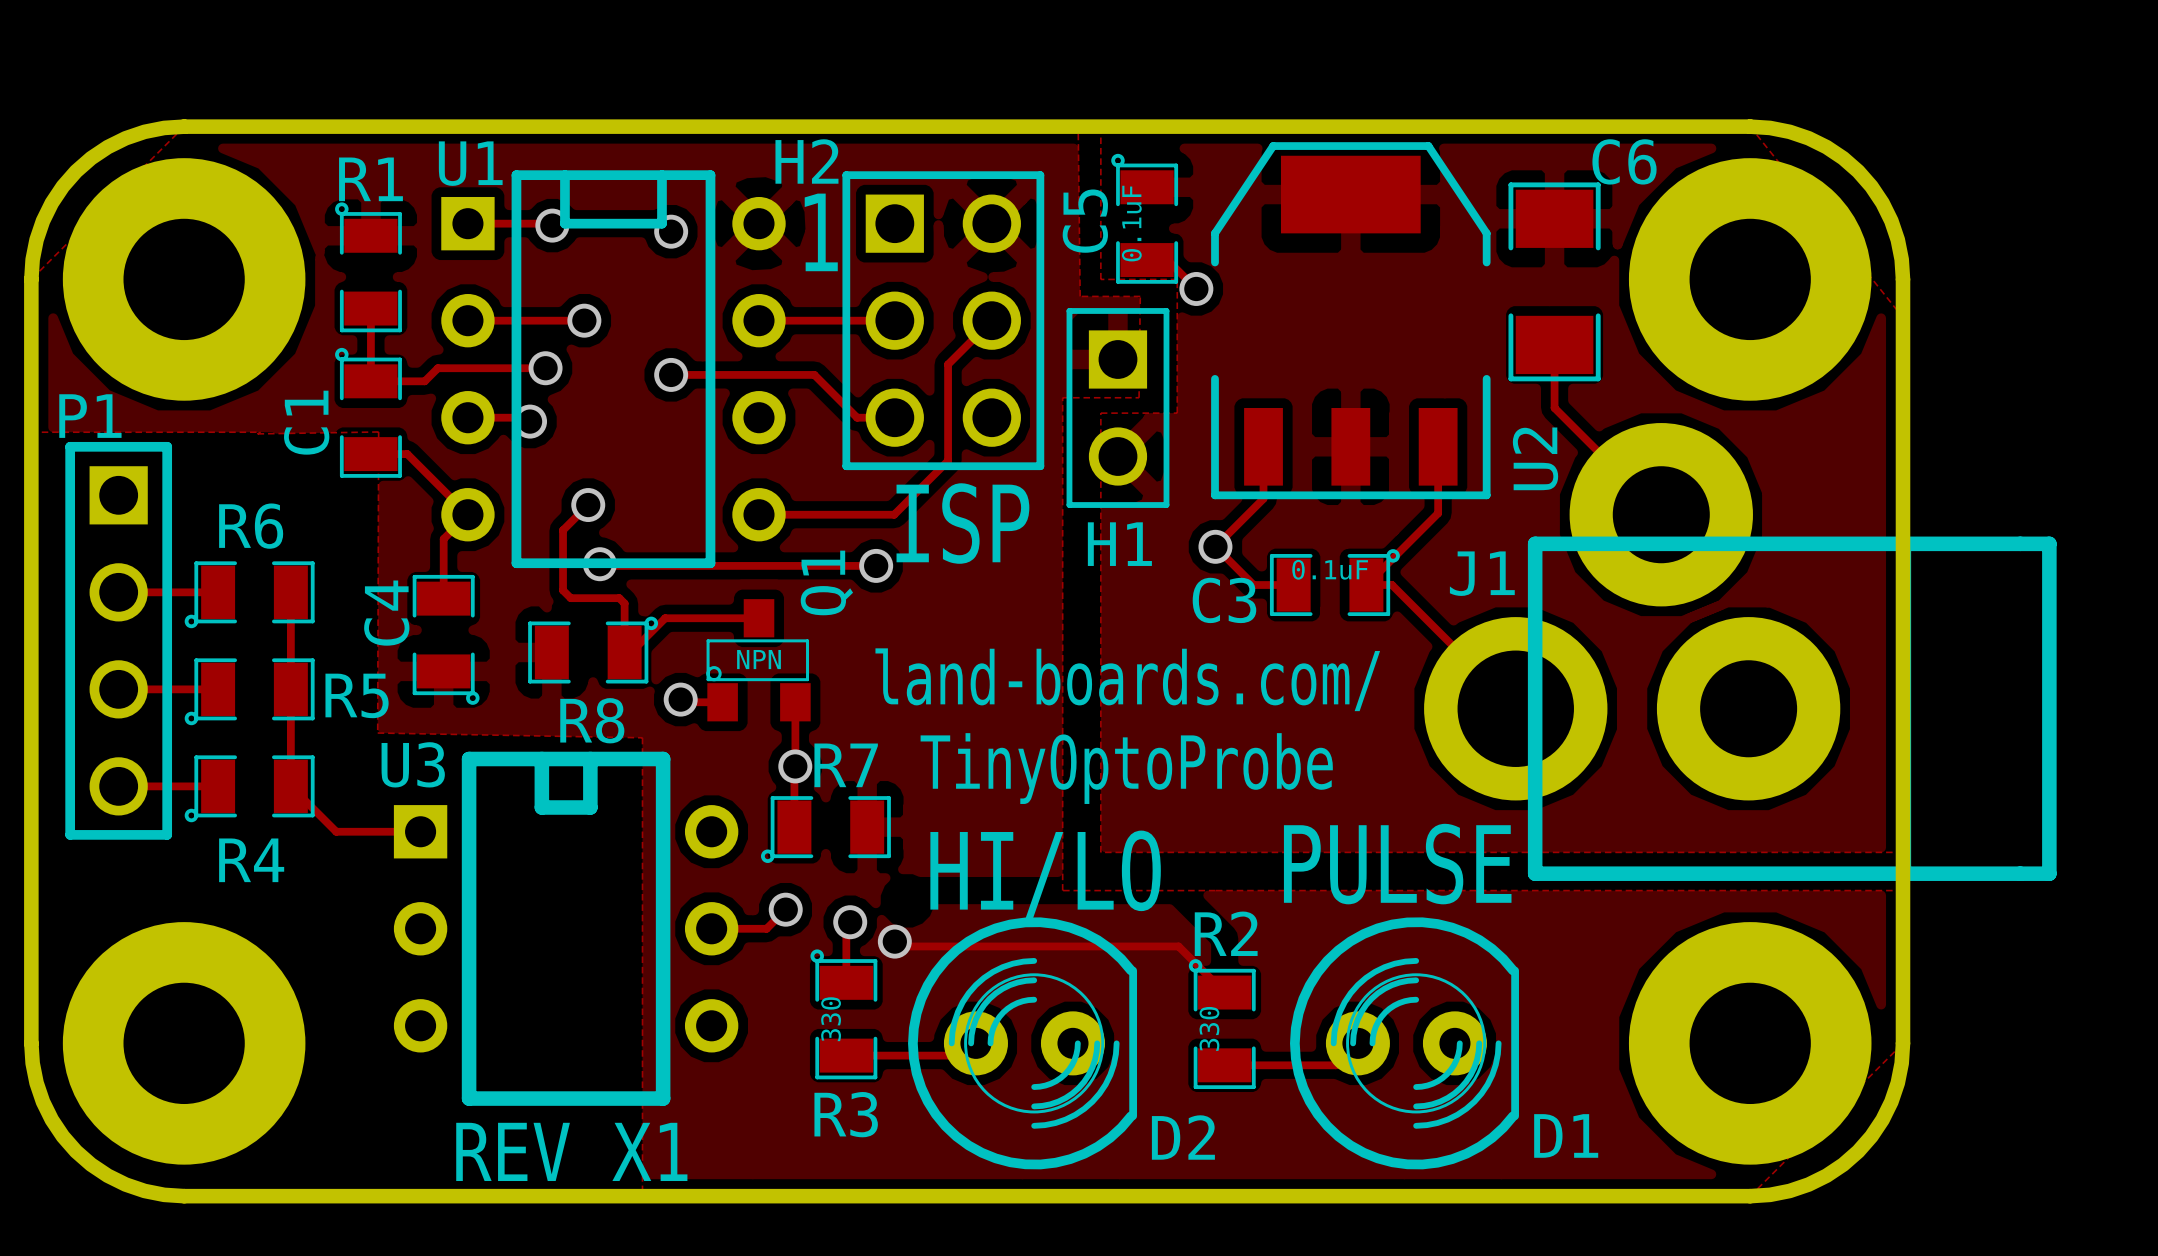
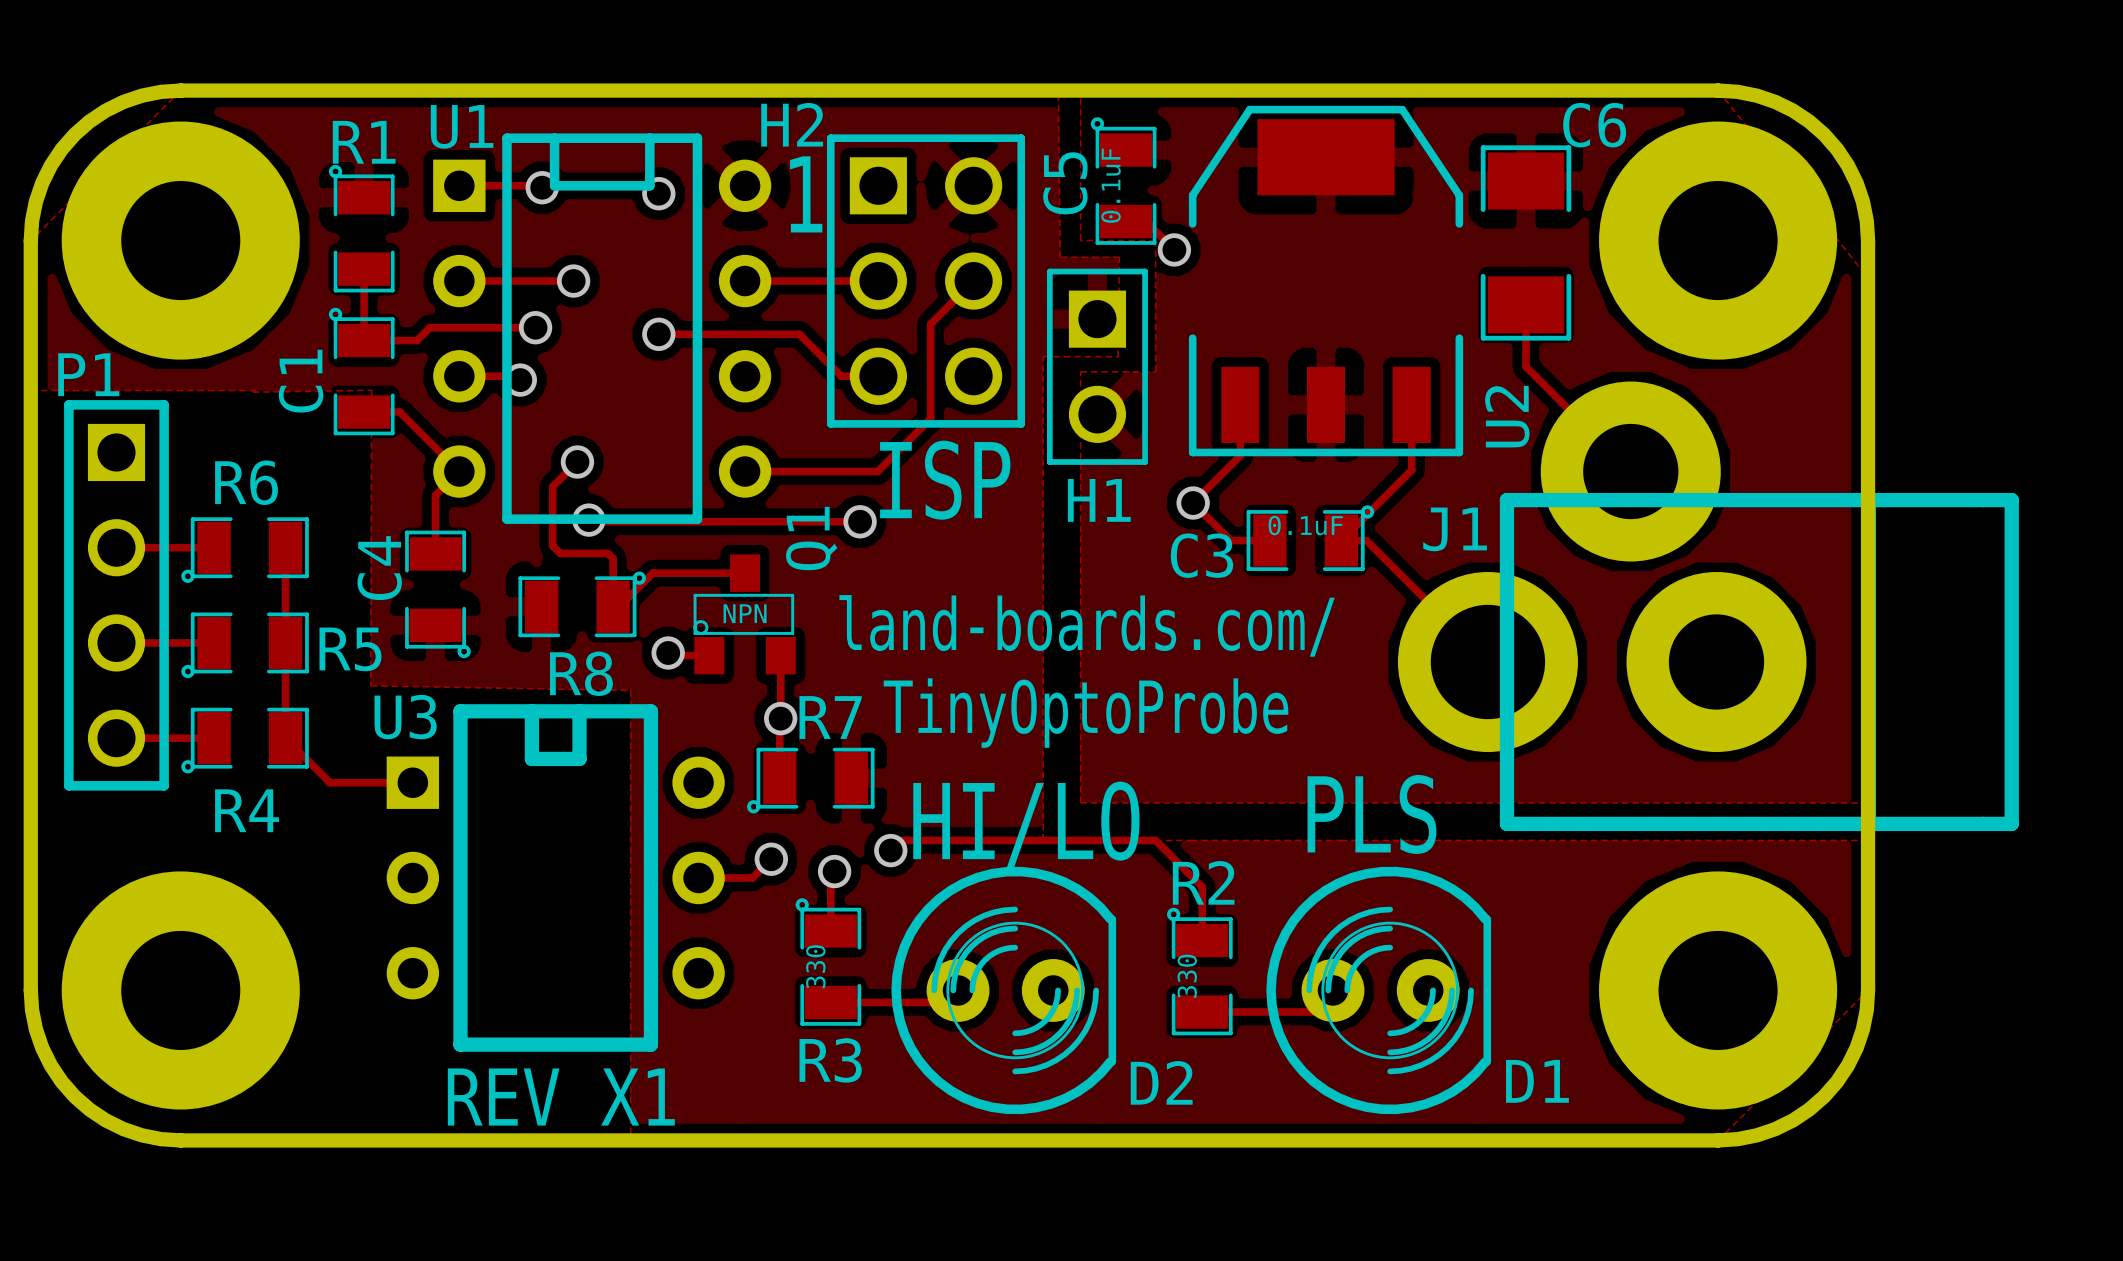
text position: land-boards.com/ (1127, 679) -> land-boards.com/ (1087, 625)
text position: TinyOptoProbe (1126, 768) -> TinyOptoProbe (1086, 713)
text: PULSE (1397, 864) -> PLS (1371, 814)
track: (894, 941) (899, 946) (1178, 946) (1224, 992) -> (890, 850) (900, 840) (1155, 840) (1202, 887) (1202, 940)
via position: (894, 941) -> (890, 850)

